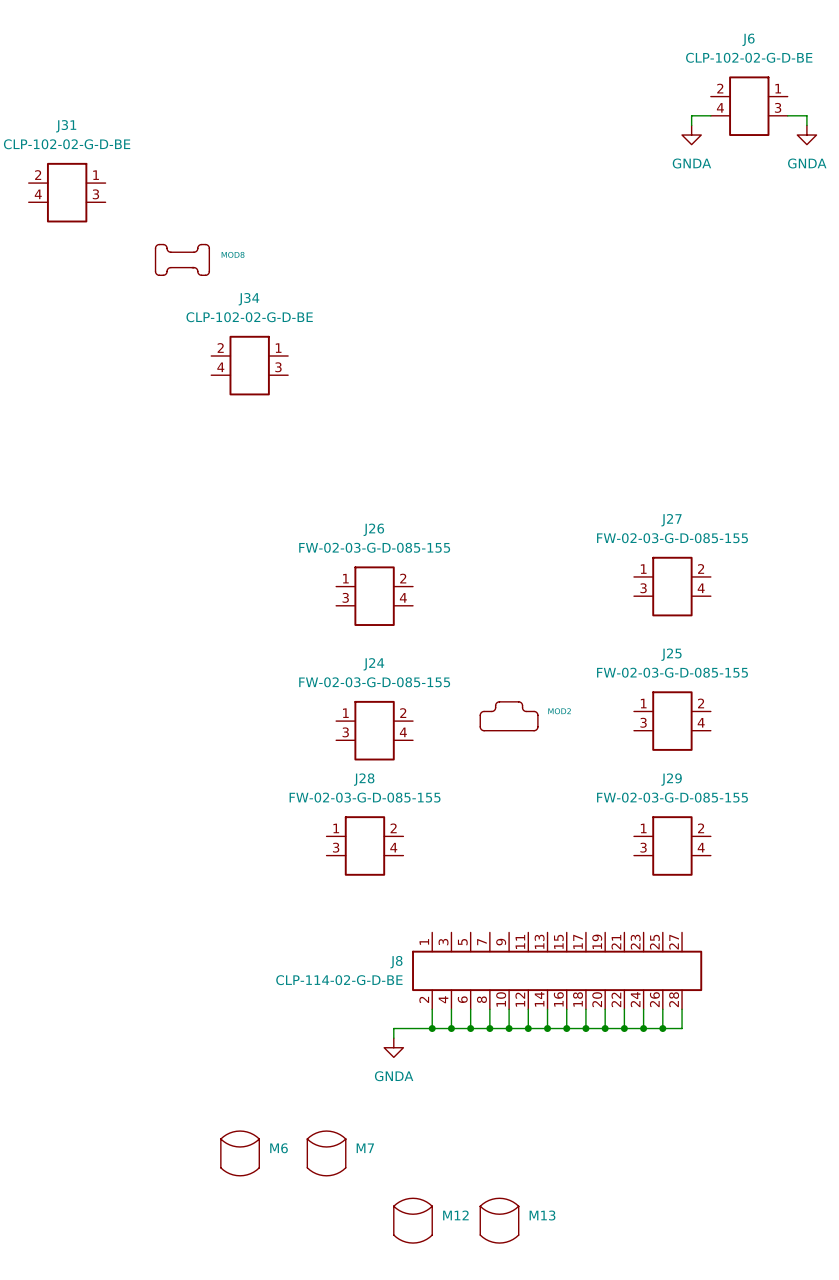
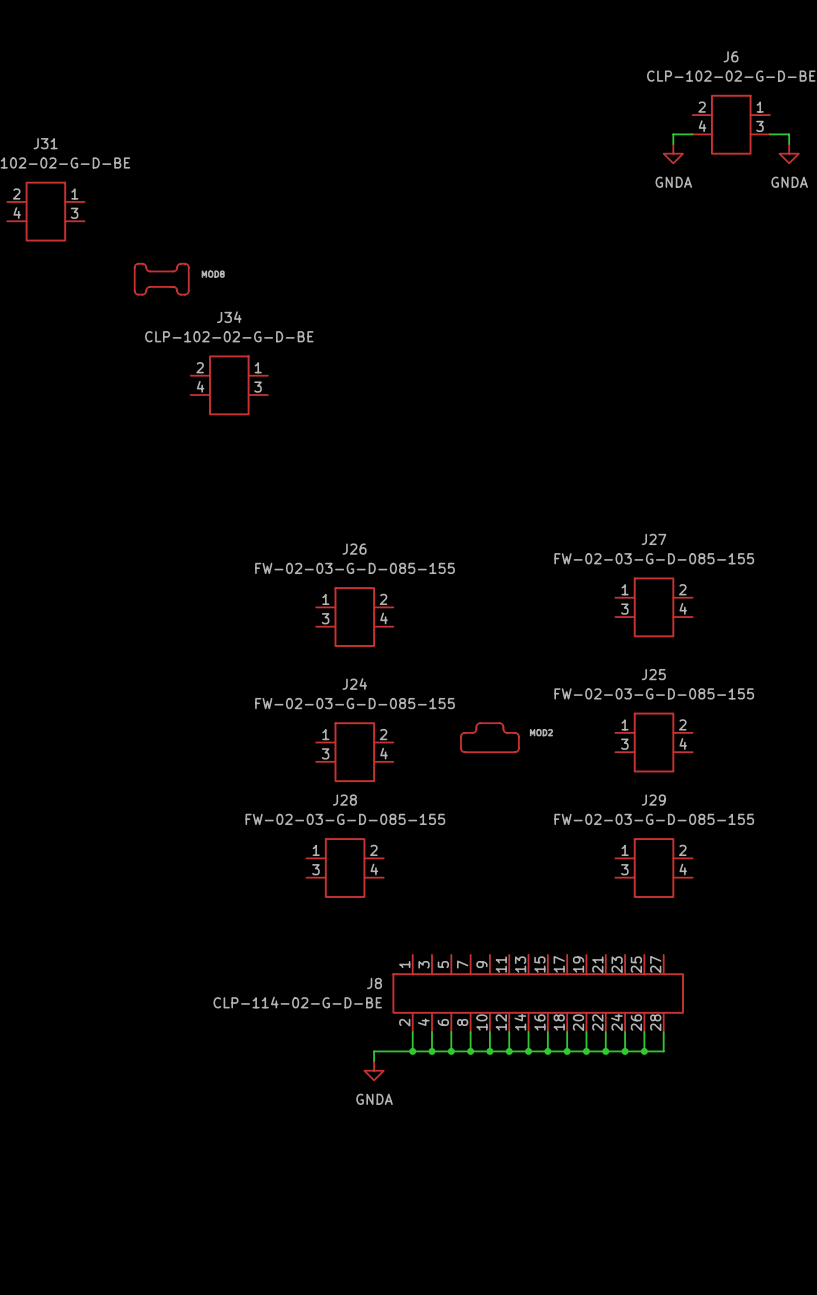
M6: (240, 1153) -> none
M7: (326, 1153) -> none
M12: (413, 1220) -> none
M13: (499, 1220) -> none

